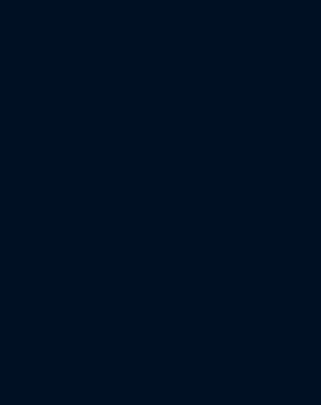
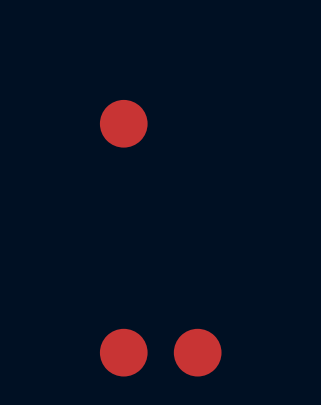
part: none -> (123, 123)
part: none -> (123, 352)
part: none -> (197, 352)

